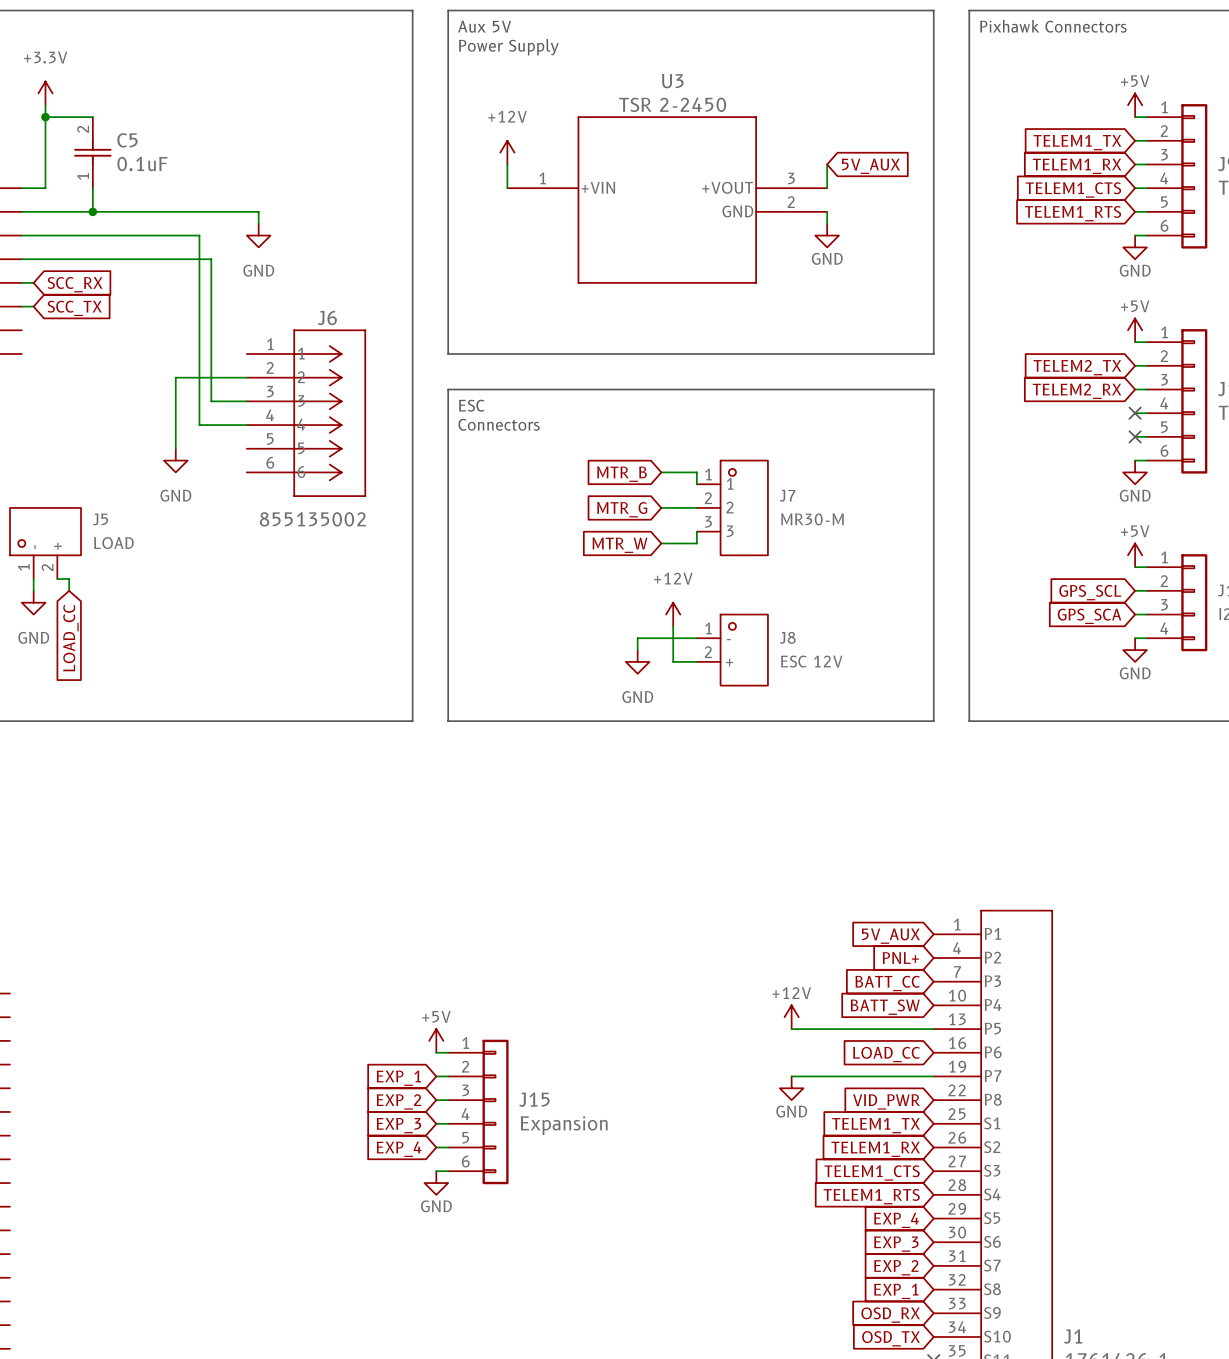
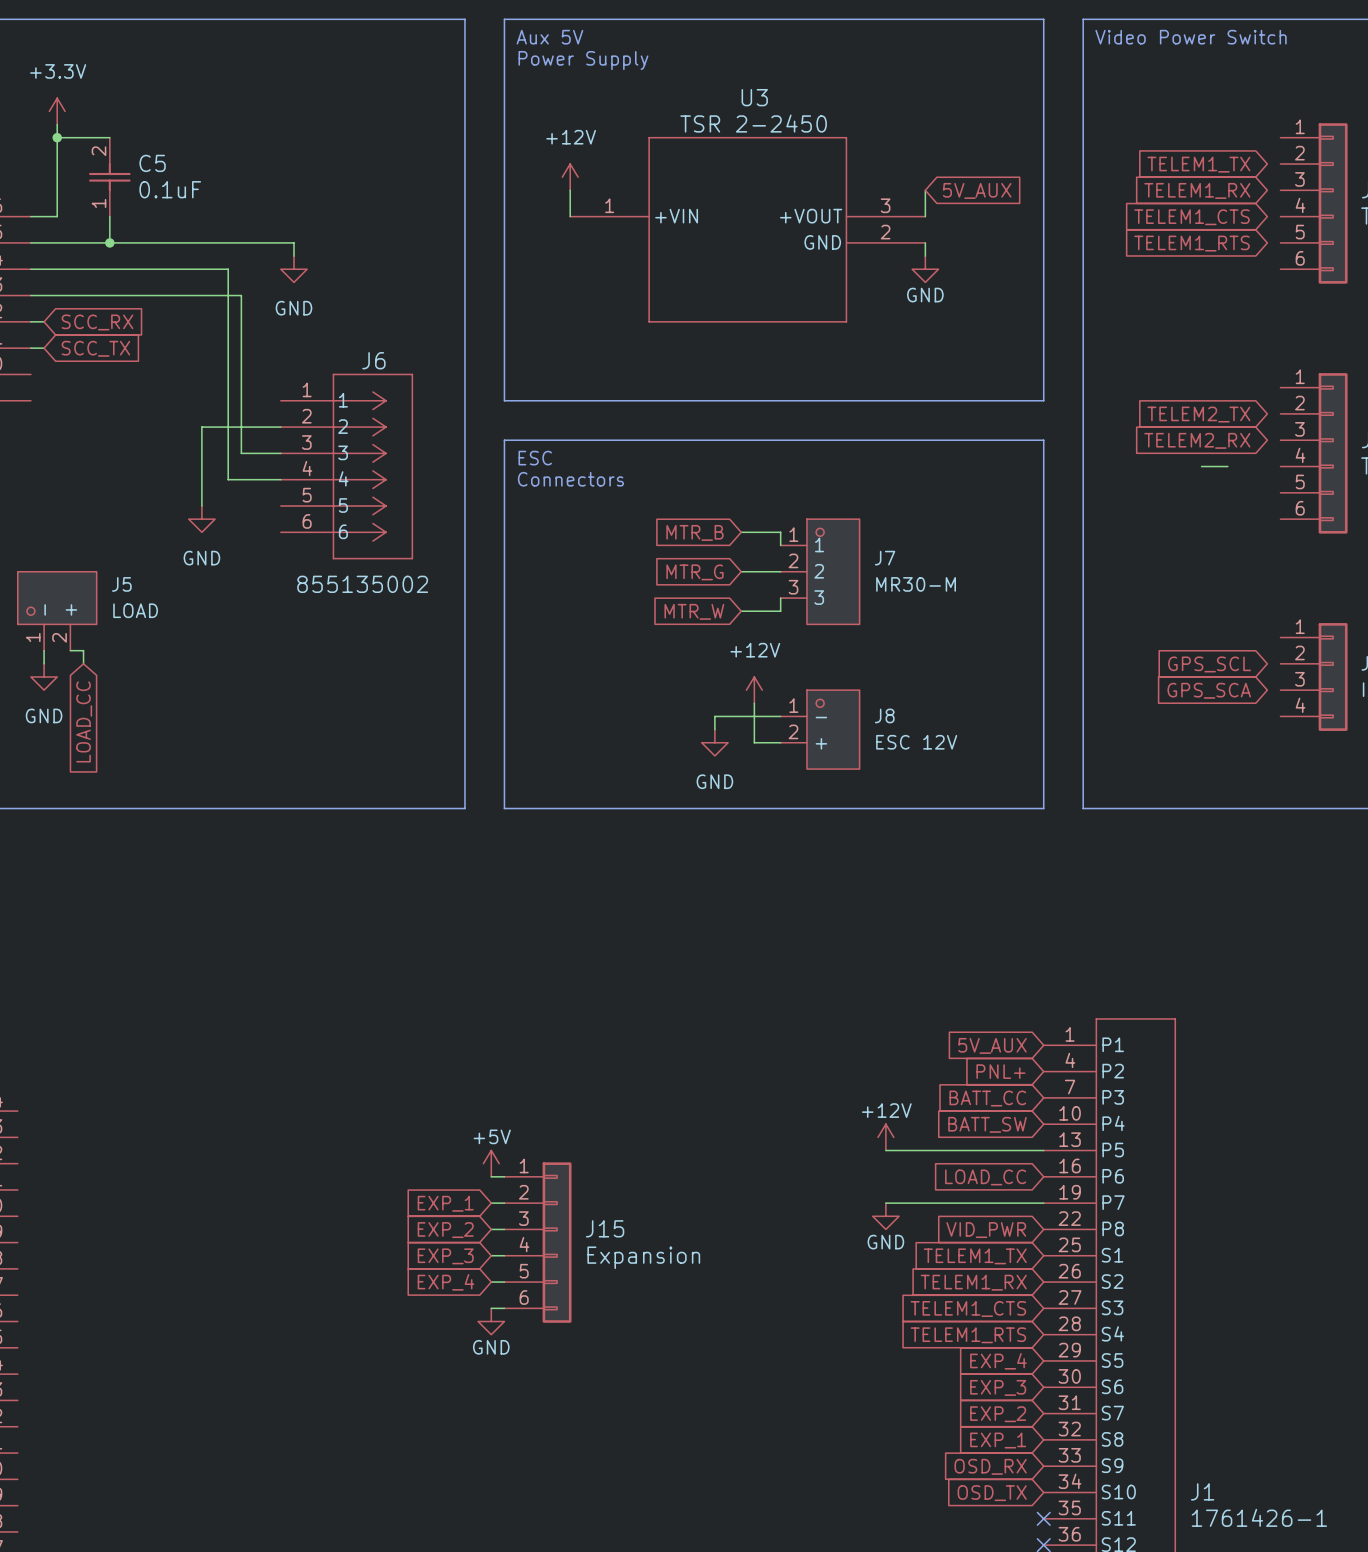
text: Pixhawk Connectors (1053, 26) -> Video Power Switch (1191, 37)
power symbol: +5V (1135, 105) -> none
wire: (1135, 117) (1146, 117) -> none
wire: (1135, 140) (1146, 140) -> none
wire: (1135, 164) (1146, 164) -> none
wire: (1135, 188) (1146, 188) -> none
wire: (1135, 211) (1146, 211) -> none
wire: (1135, 235) (1146, 235) -> none
power symbol: GND (1135, 247) -> none
power symbol: +5V (1135, 330) -> none
wire: (1135, 342) (1146, 342) -> none
wire: (1135, 365) (1146, 365) -> none
wire: (1135, 389) (1146, 389) -> none
wire: none -> (1201, 466) (1227, 466)
wire: (1135, 413) (1146, 413) -> none
no-connect mark: (1135, 413) -> none
wire: (1135, 436) (1146, 436) -> none
no-connect mark: (1135, 436) -> none
wire: (1135, 460) (1146, 460) -> none
power symbol: GND (1135, 472) -> none
power symbol: +5V (1135, 555) -> none
wire: (1135, 567) (1146, 567) -> none
wire: (1135, 590) (1146, 590) -> none
wire: (1135, 614) (1146, 614) -> none
wire: (1135, 638) (1146, 638) -> none
power symbol: GND (1135, 650) -> none

